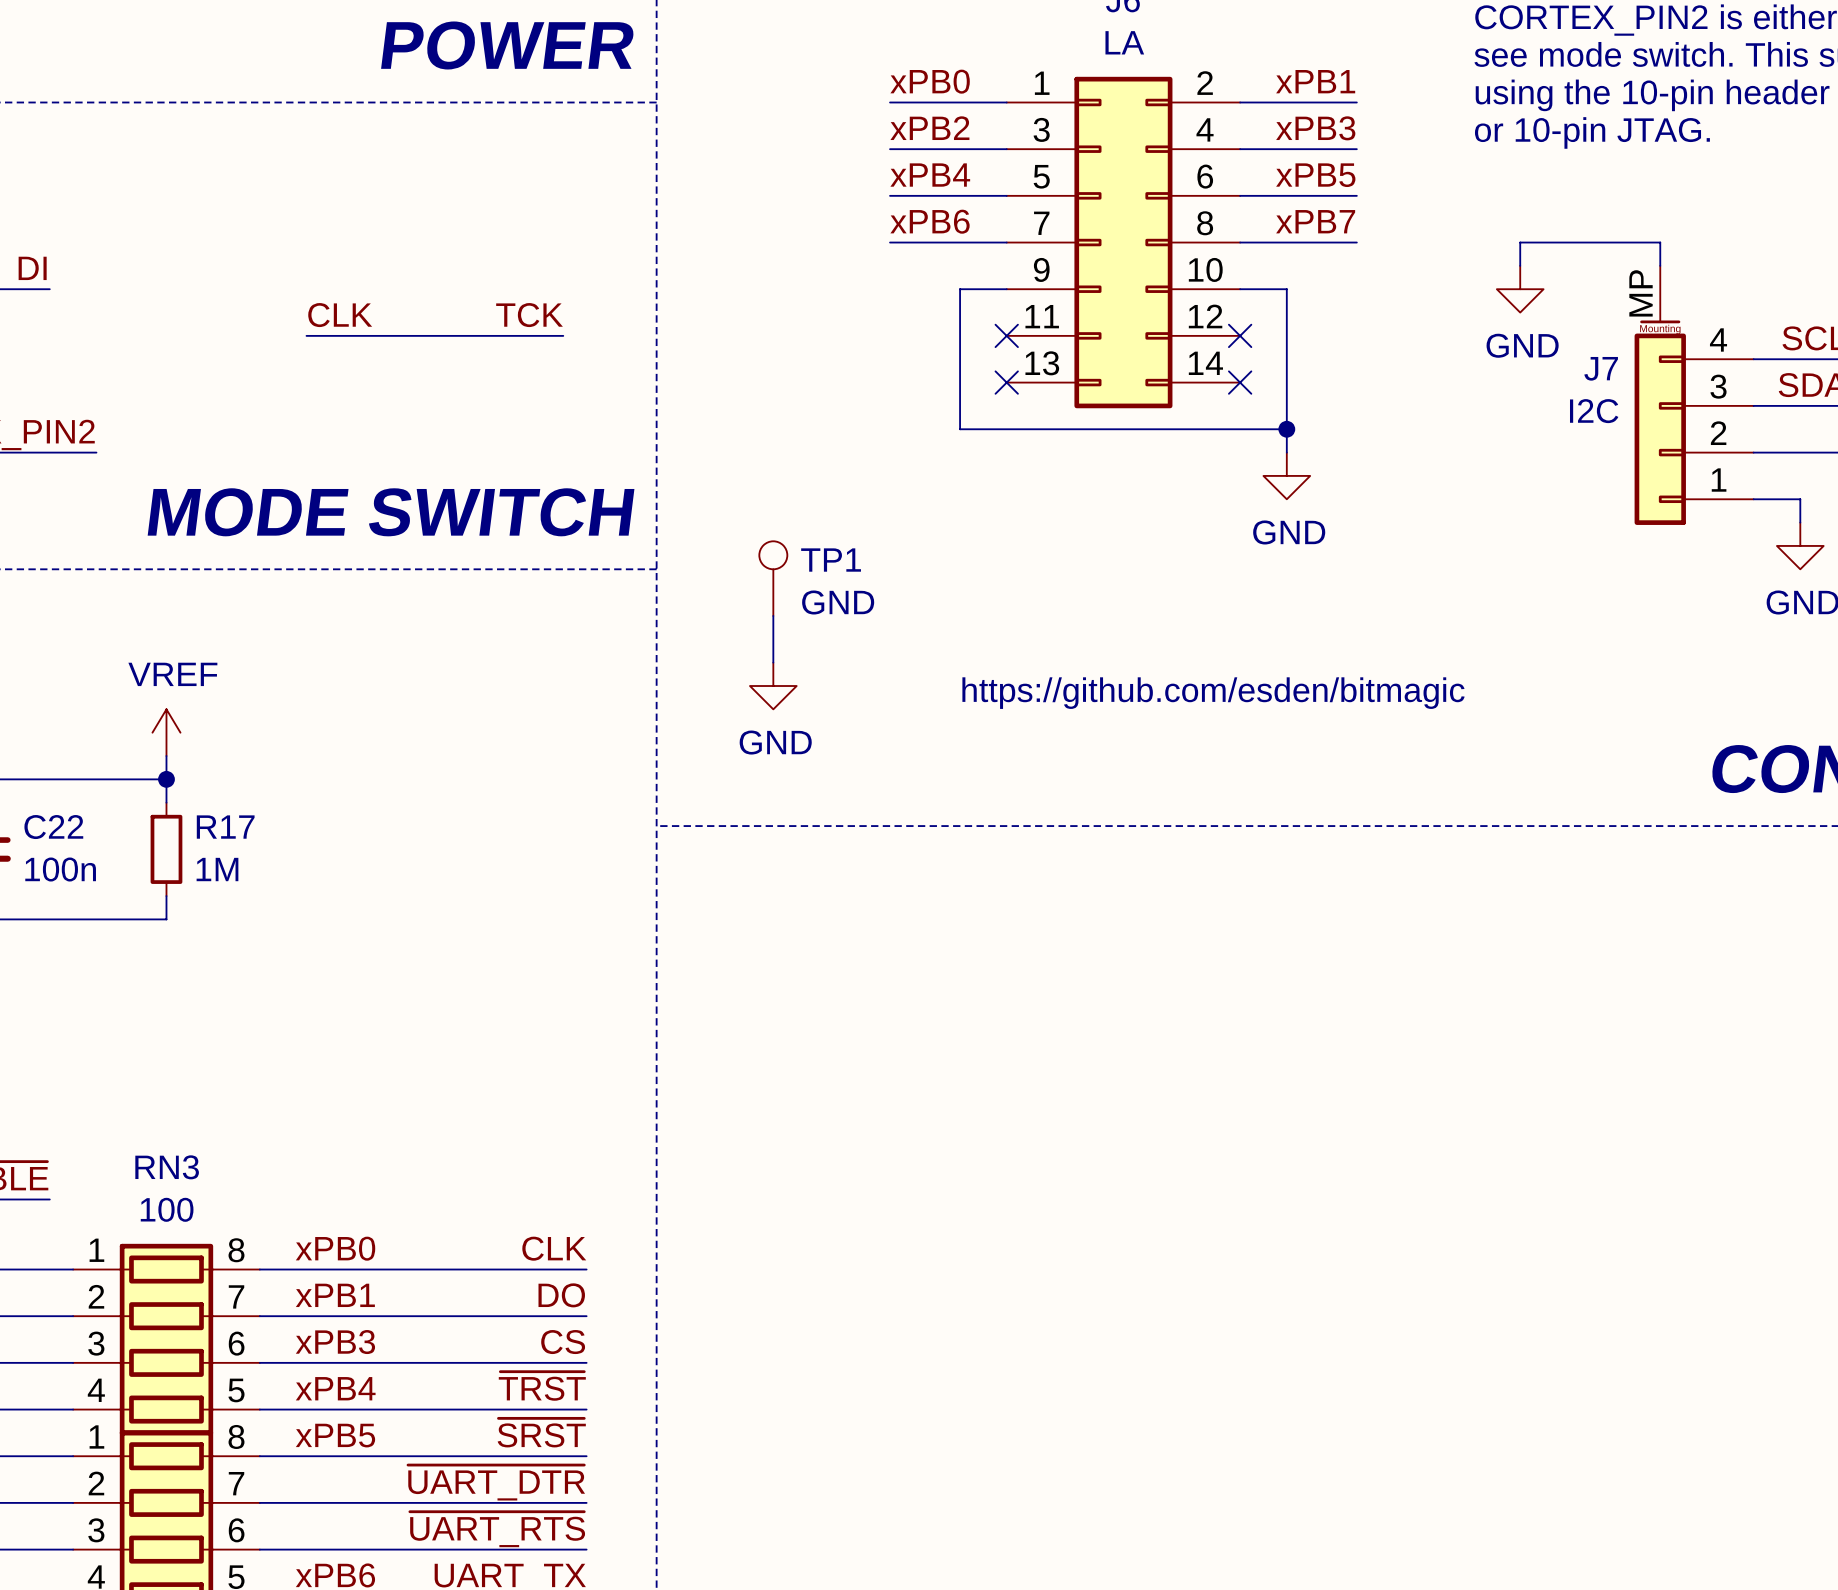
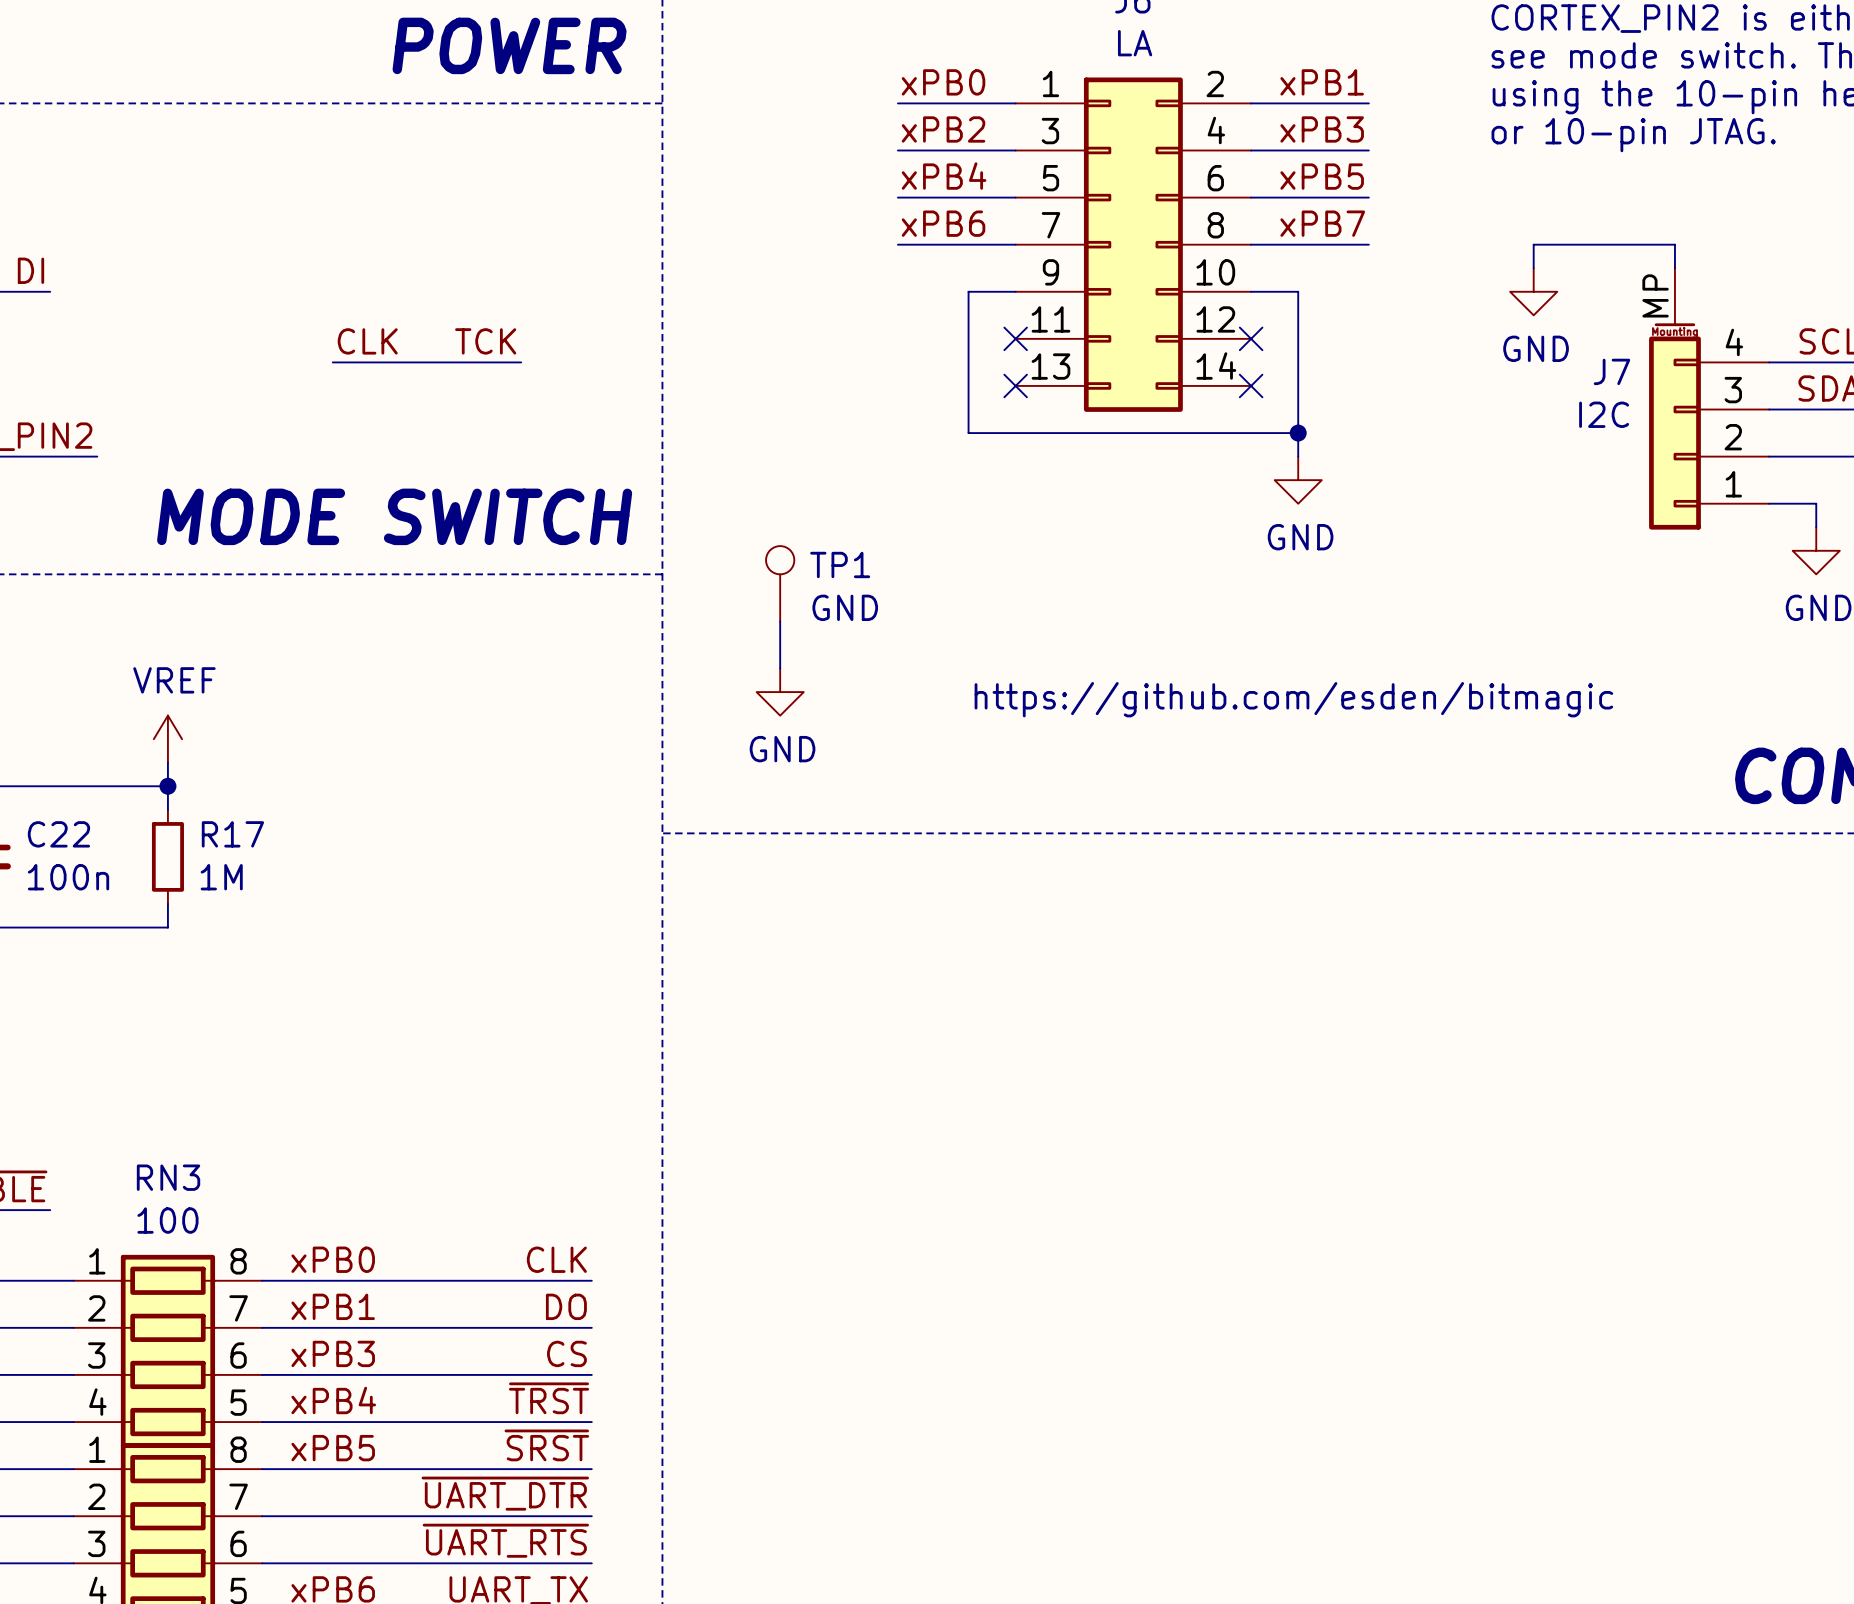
label position: CLK (340, 315) -> CLK (367, 341)
label position: TCK (529, 315) -> TCK (485, 341)
wire: (306, 335) (563, 335) -> none
wire: none -> (332, 362) (521, 362)

